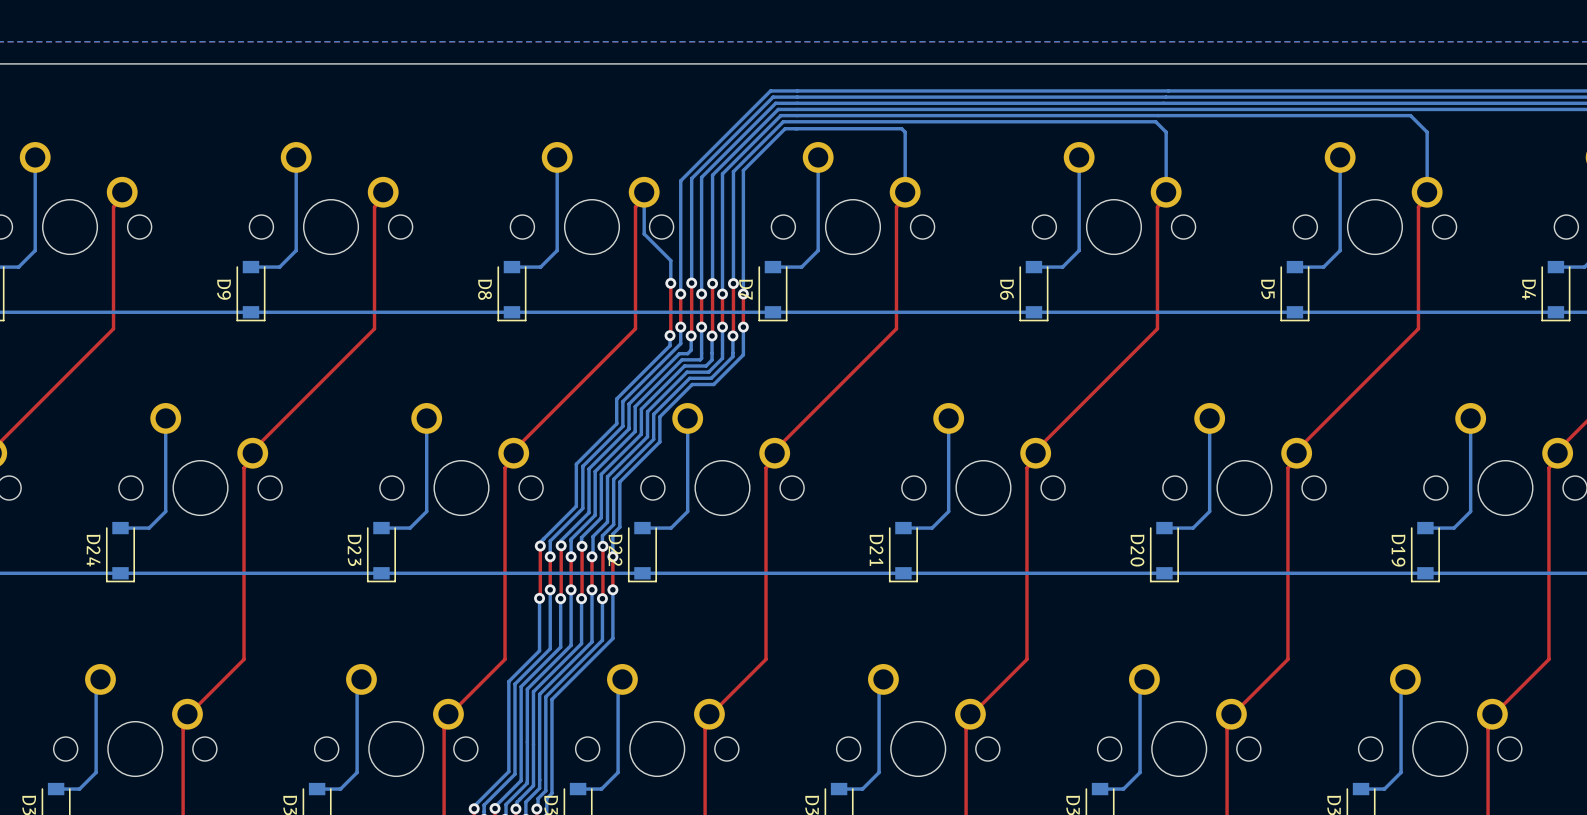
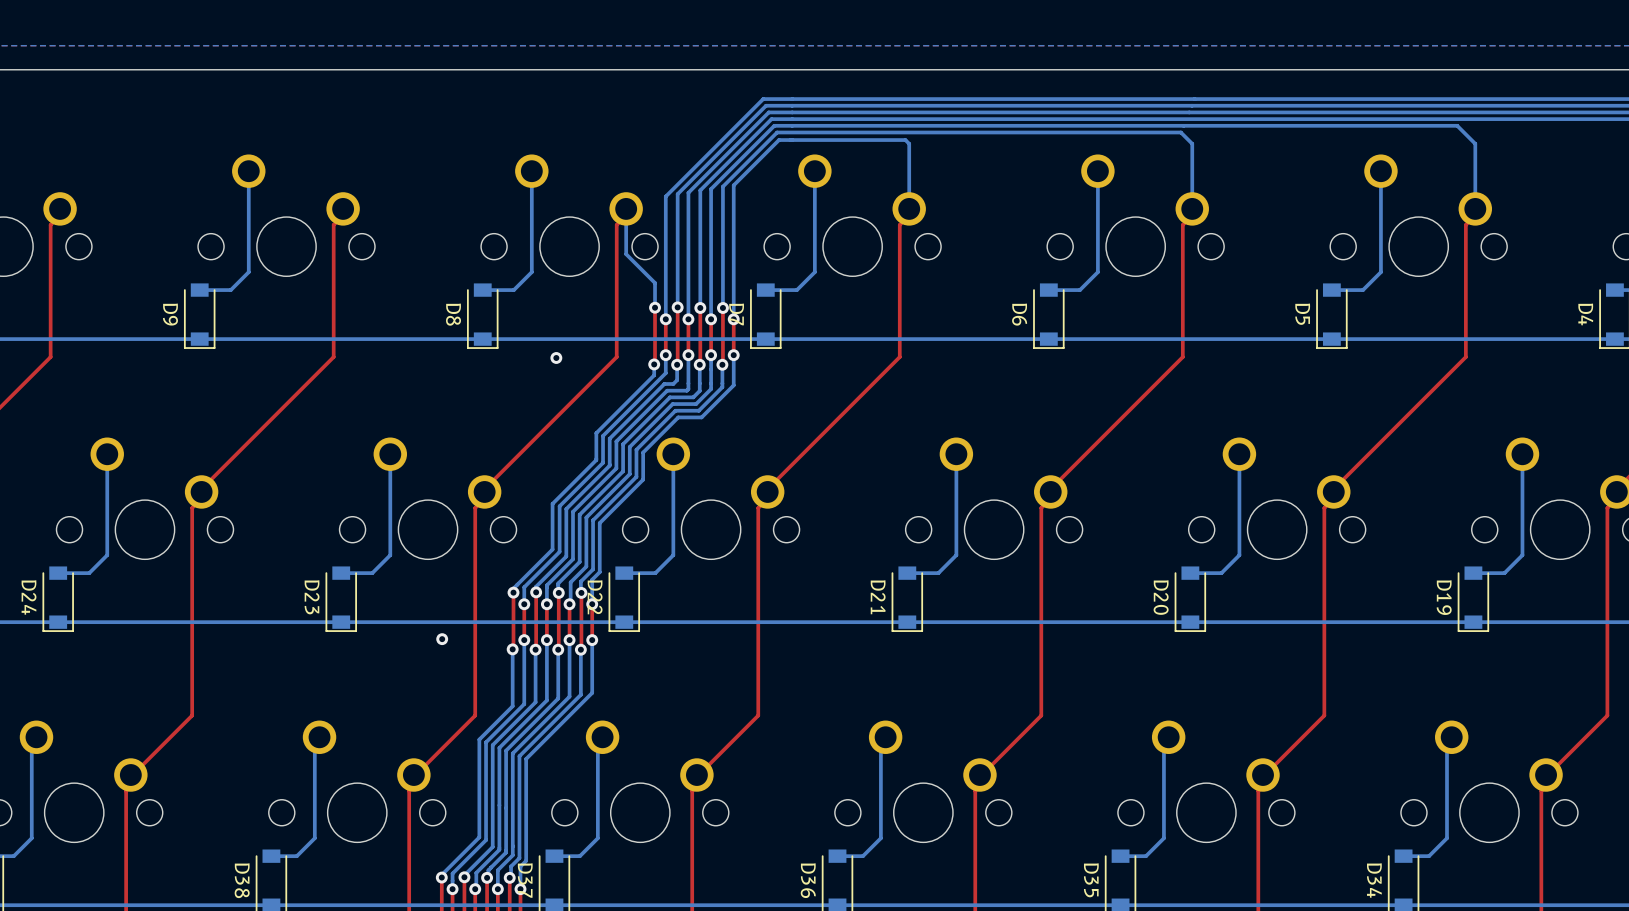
via: none -> (556, 357)
via: none -> (442, 639)

